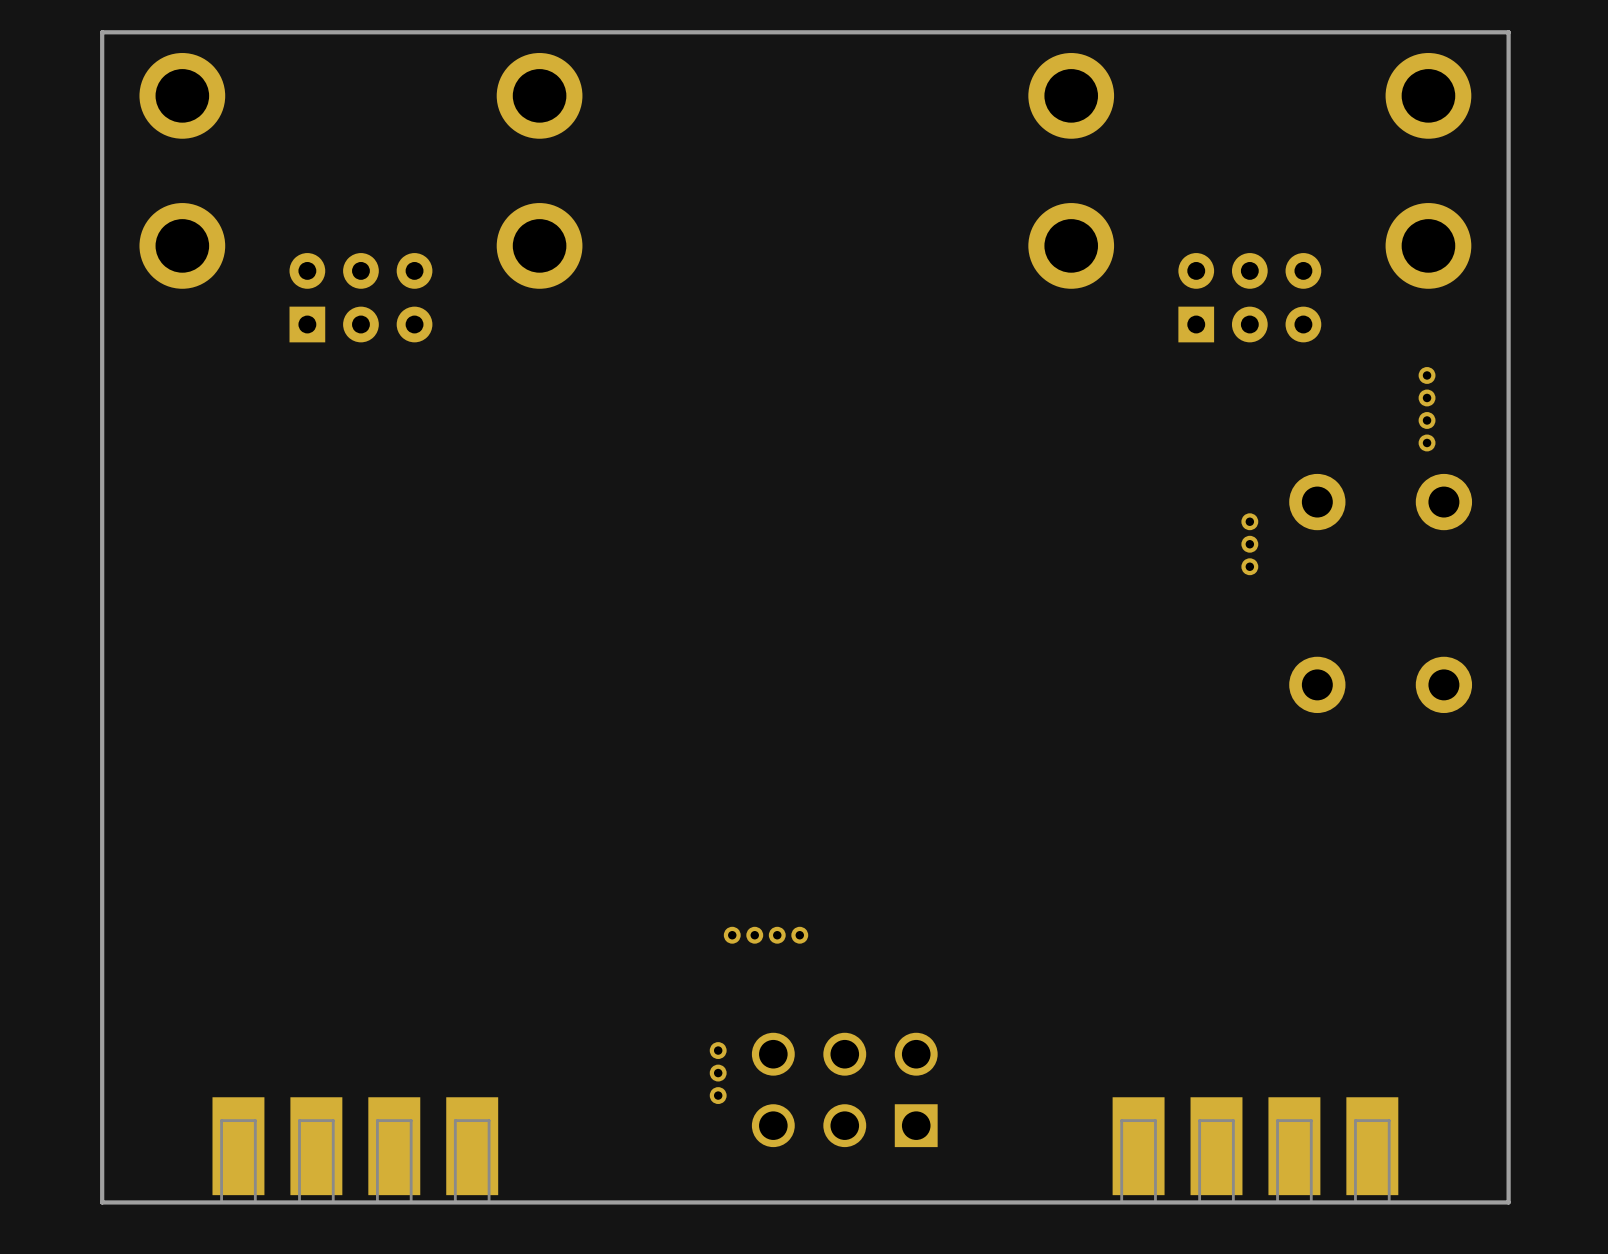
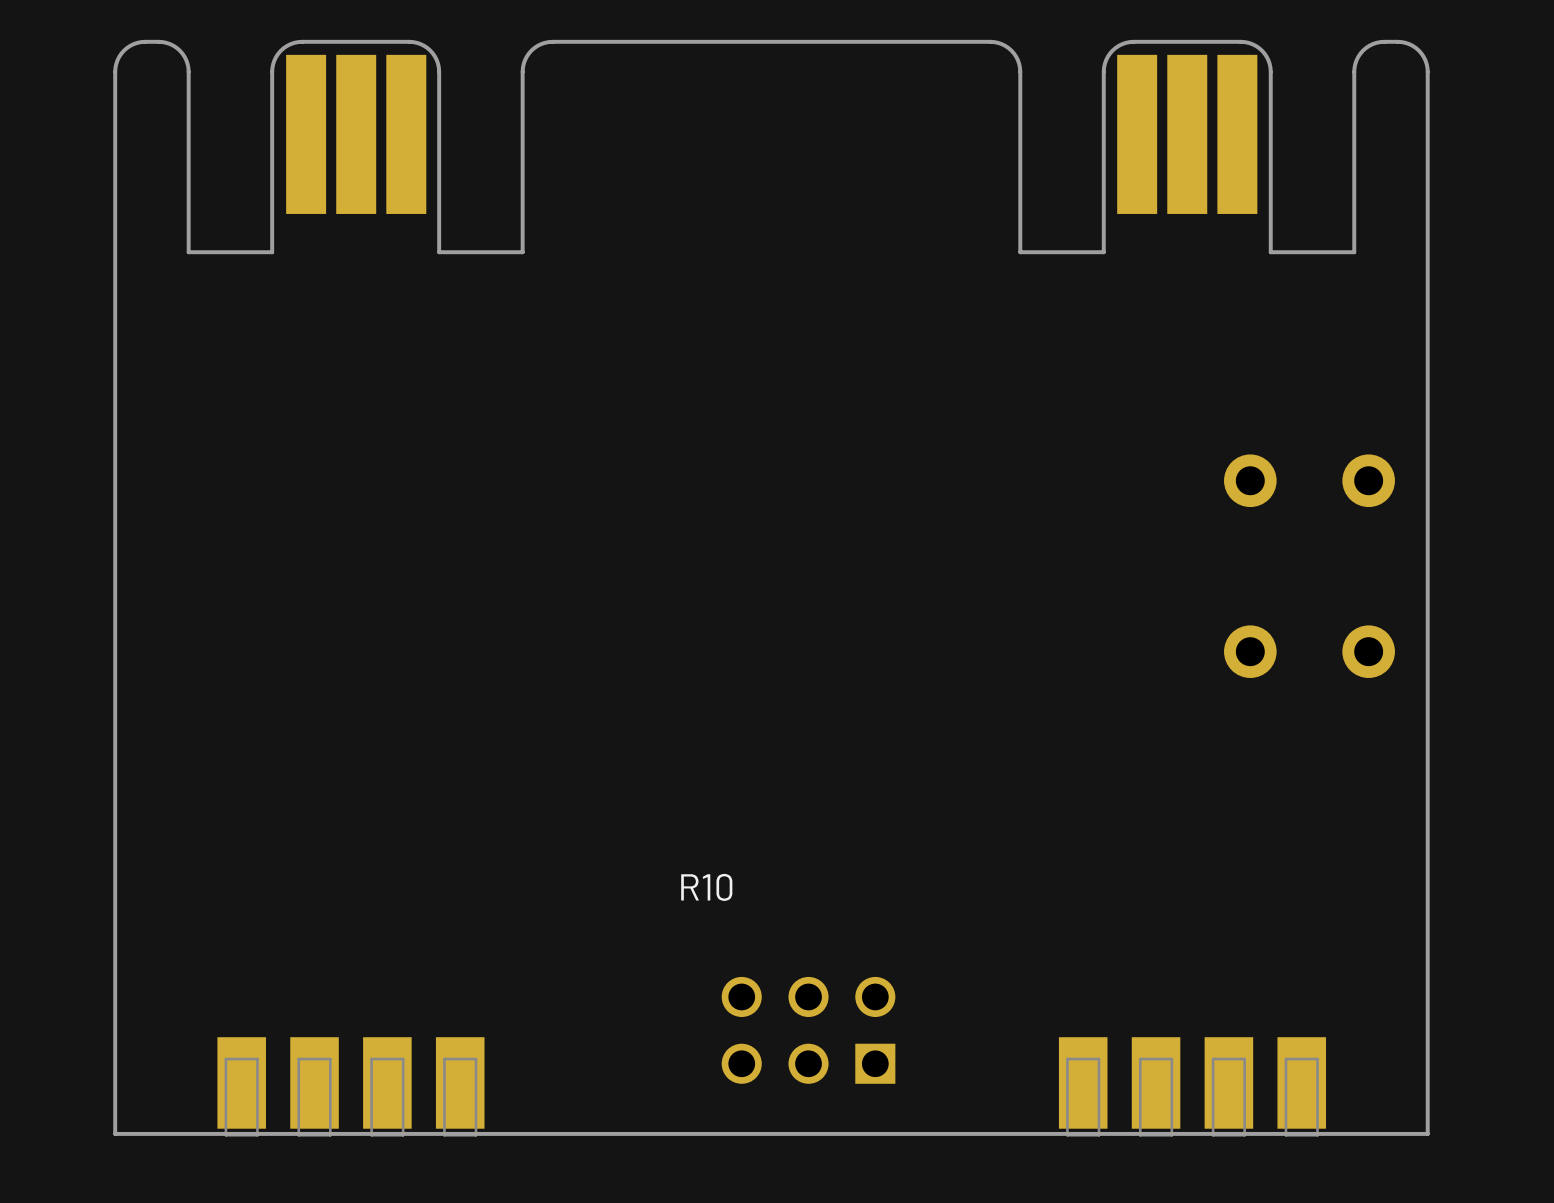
board edge: (1508, 32) (1508, 1202) (102, 1202) (102, 32) (1508, 32) -> (1397, 41) (1409, 44) (1418, 50) (1425, 60) (1427, 71) (1427, 1133) (115, 1133) (115, 71) (117, 60) (126, 48) (141, 42) (166, 42) (179, 50) (187, 64) (188, 252) (272, 252) (272, 67) (274, 60) (280, 50) (290, 44) (302, 41) (413, 42) (427, 48) (435, 56) (439, 71) (439, 252) (522, 252) (522, 67) (524, 60) (531, 50) (544, 42) (990, 41) (1001, 44) (1014, 53) (1020, 67) (1020, 252) (1103, 252) (1103, 71) (1106, 60) (1112, 50) (1122, 44) (1133, 41) (1248, 42) (1261, 50) (1268, 60) (1270, 67) (1270, 252) (1354, 252) (1355, 64) (1360, 53) (1369, 45) (1380, 42) (1397, 41)
part: none -> (356, 134)
part: none -> (1187, 134)
part: (360, 197) -> none
part: (1249, 197) -> none
part: (1427, 375) -> none
part: (1427, 397) -> none
part: (1427, 420) -> none
part: (1427, 442) -> none
part: (1249, 521) -> none
part: (1249, 544) -> none
part: (1249, 566) -> none
part: (732, 935) -> none
part: (754, 935) -> none
part: (777, 935) -> none
part: (799, 935) -> none
R10: none -> (706, 887)
part: (718, 1050) -> none
part: (718, 1073) -> none
part: (718, 1095) -> none

